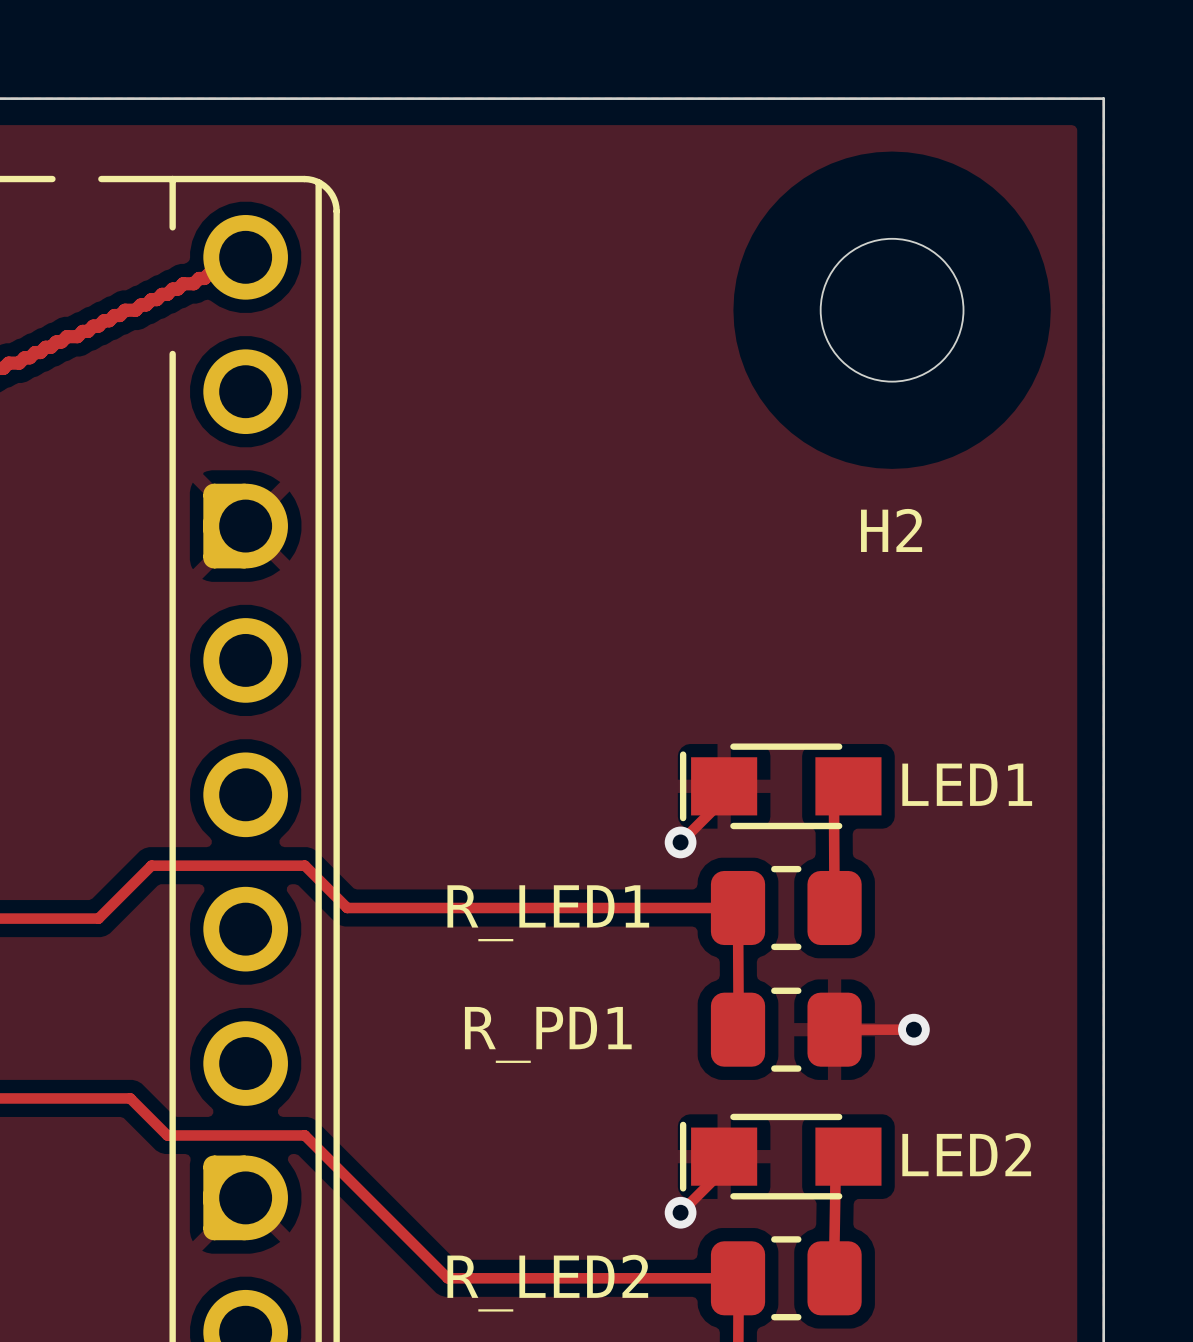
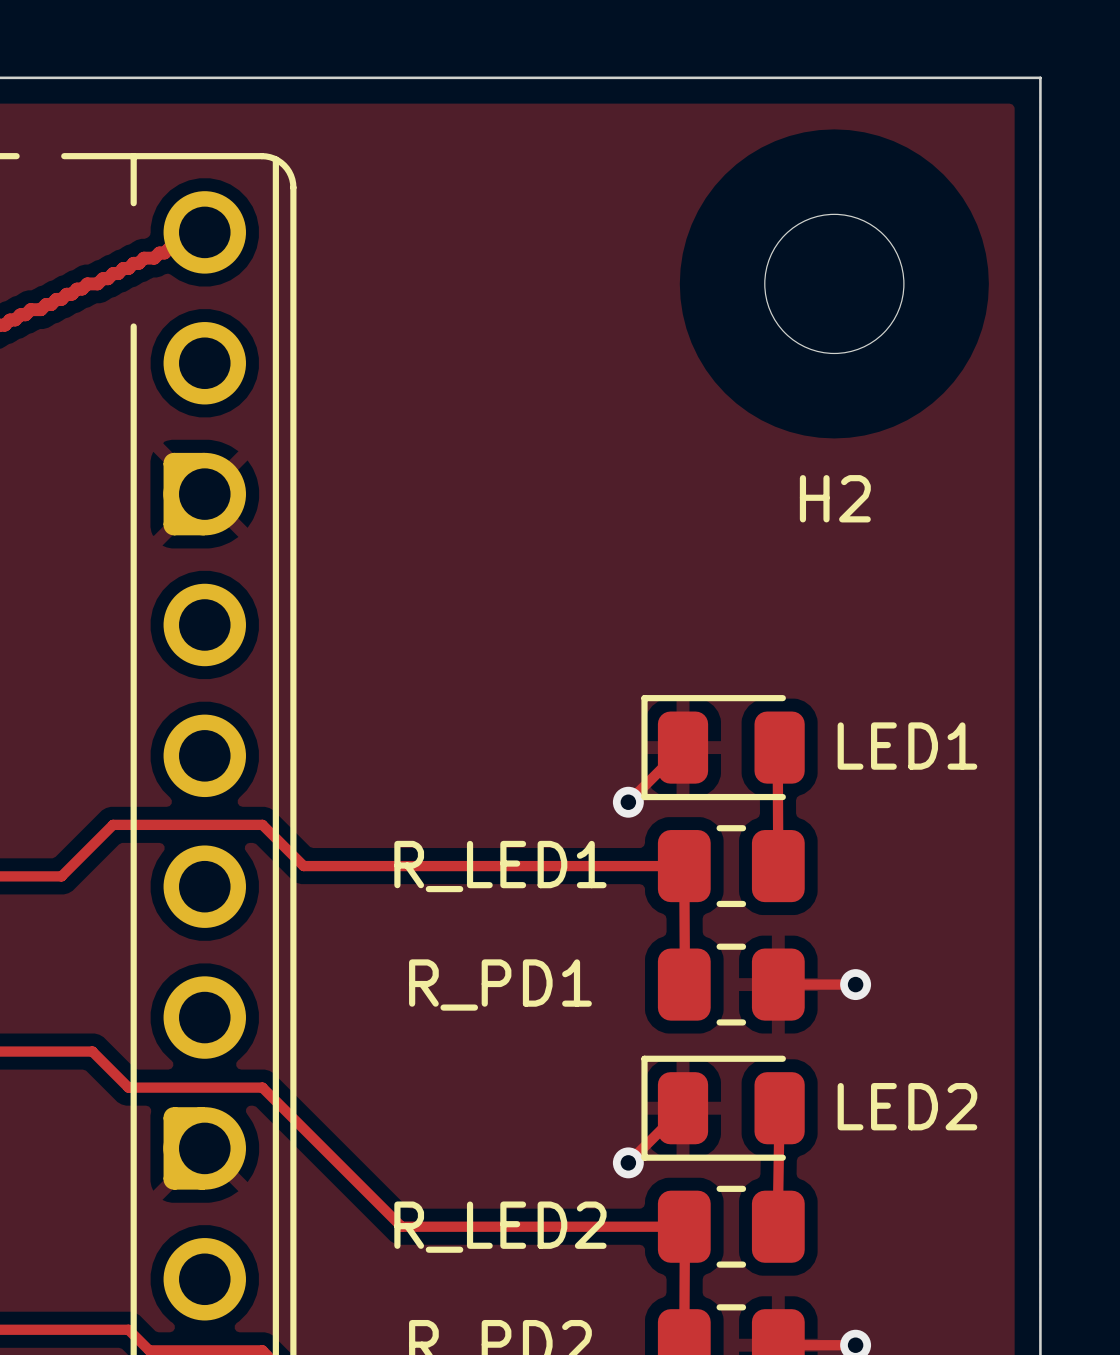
part footprint: [679, 743, 882, 830] -> [641, 695, 805, 801]
part footprint: [679, 1113, 882, 1200] -> [641, 1055, 805, 1161]

